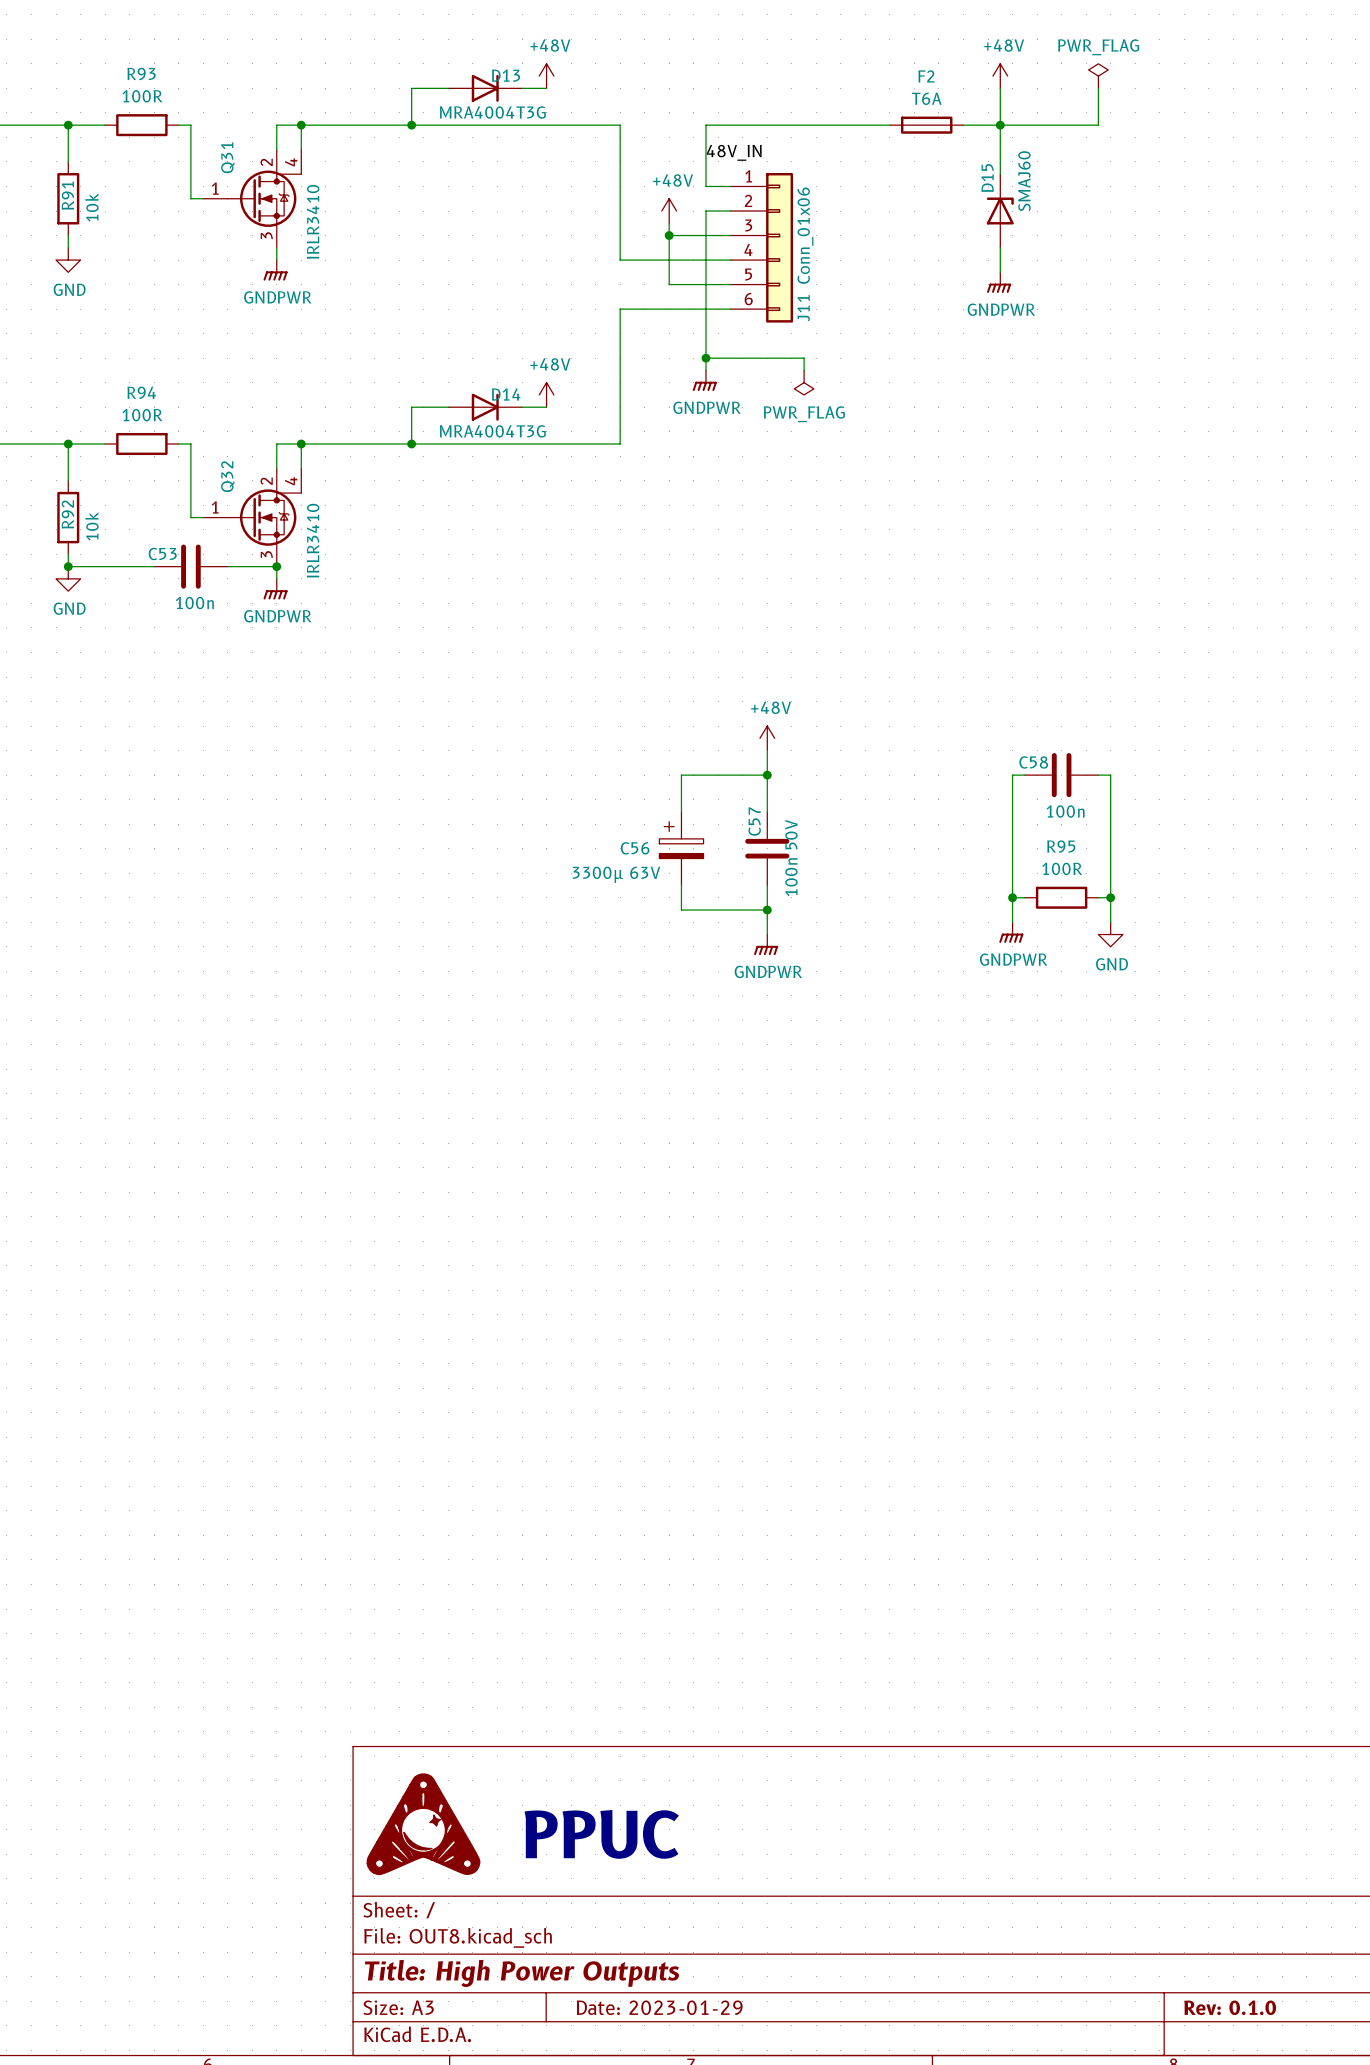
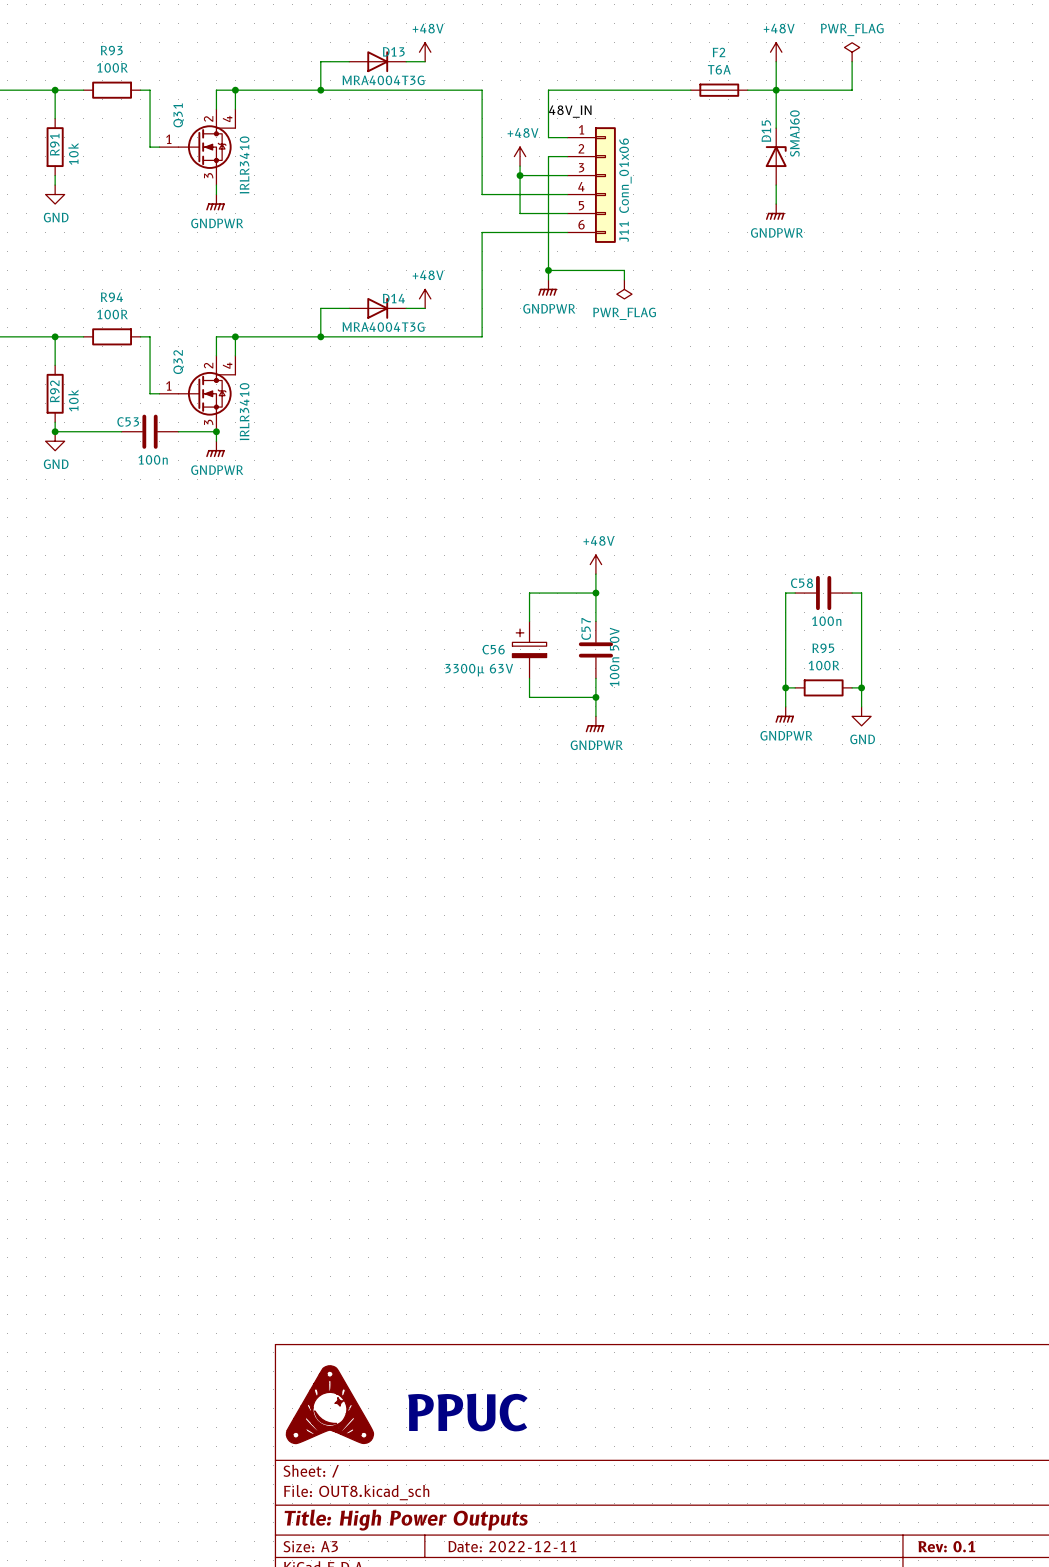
title block: Date: 2023-01-29 (659, 2007) -> Date: 2022-12-11 (512, 1546)
title block: Rev: 0.1.0 (1230, 2007) -> Rev: 0.1 (946, 1546)

